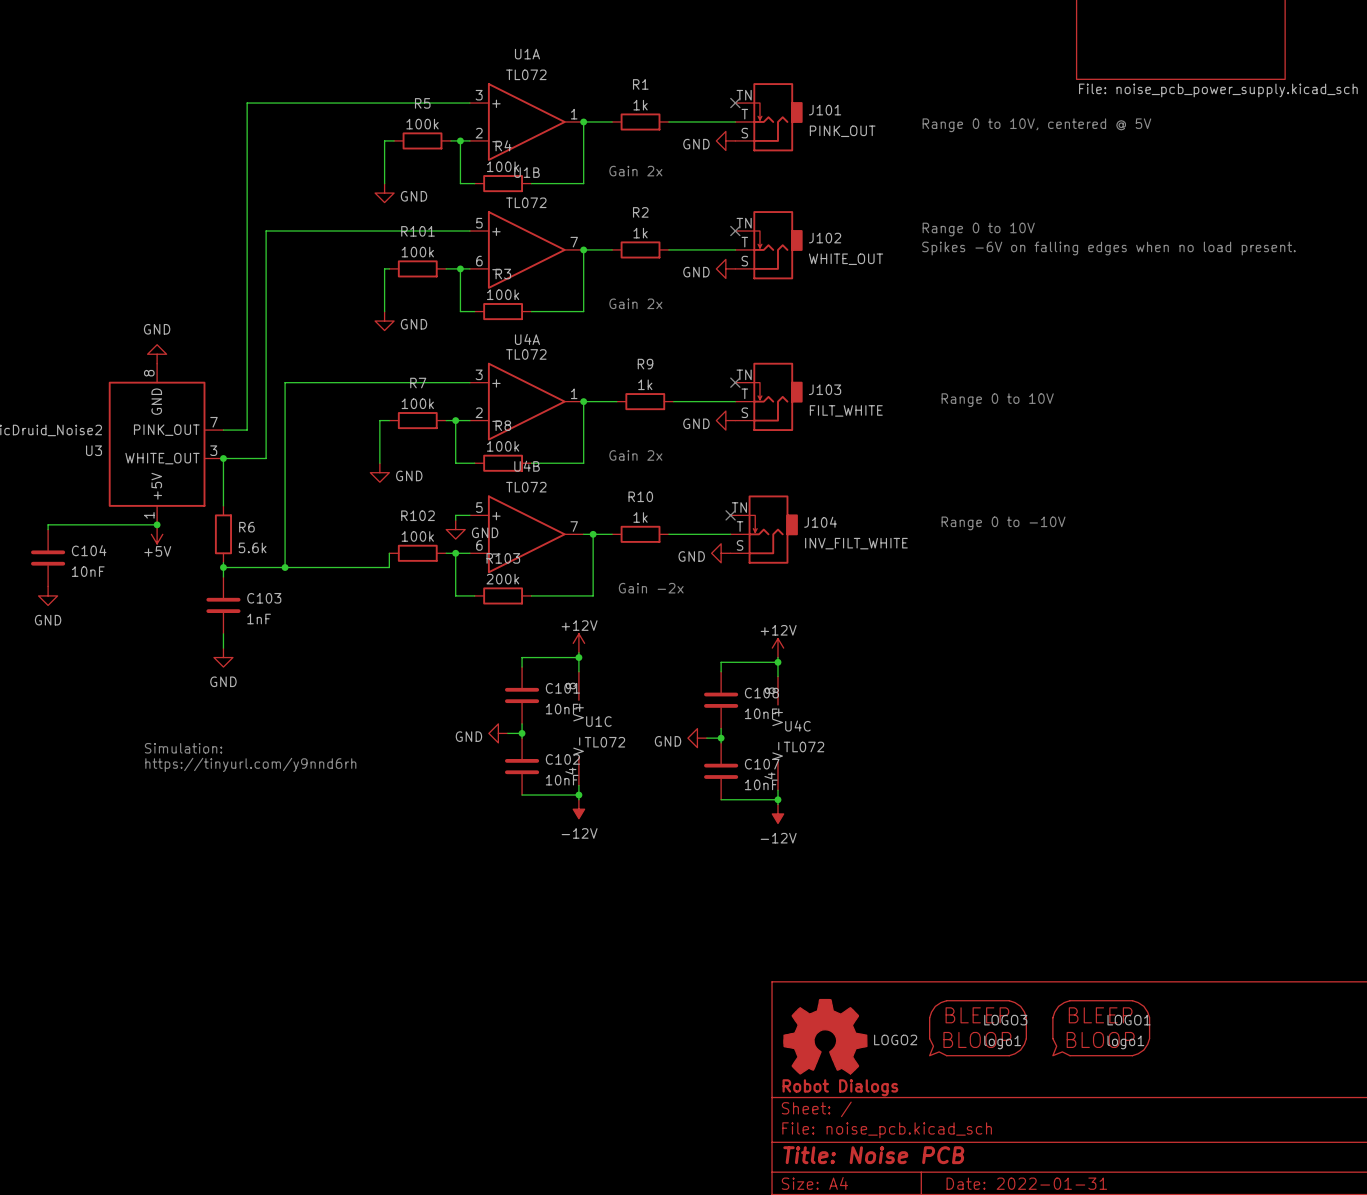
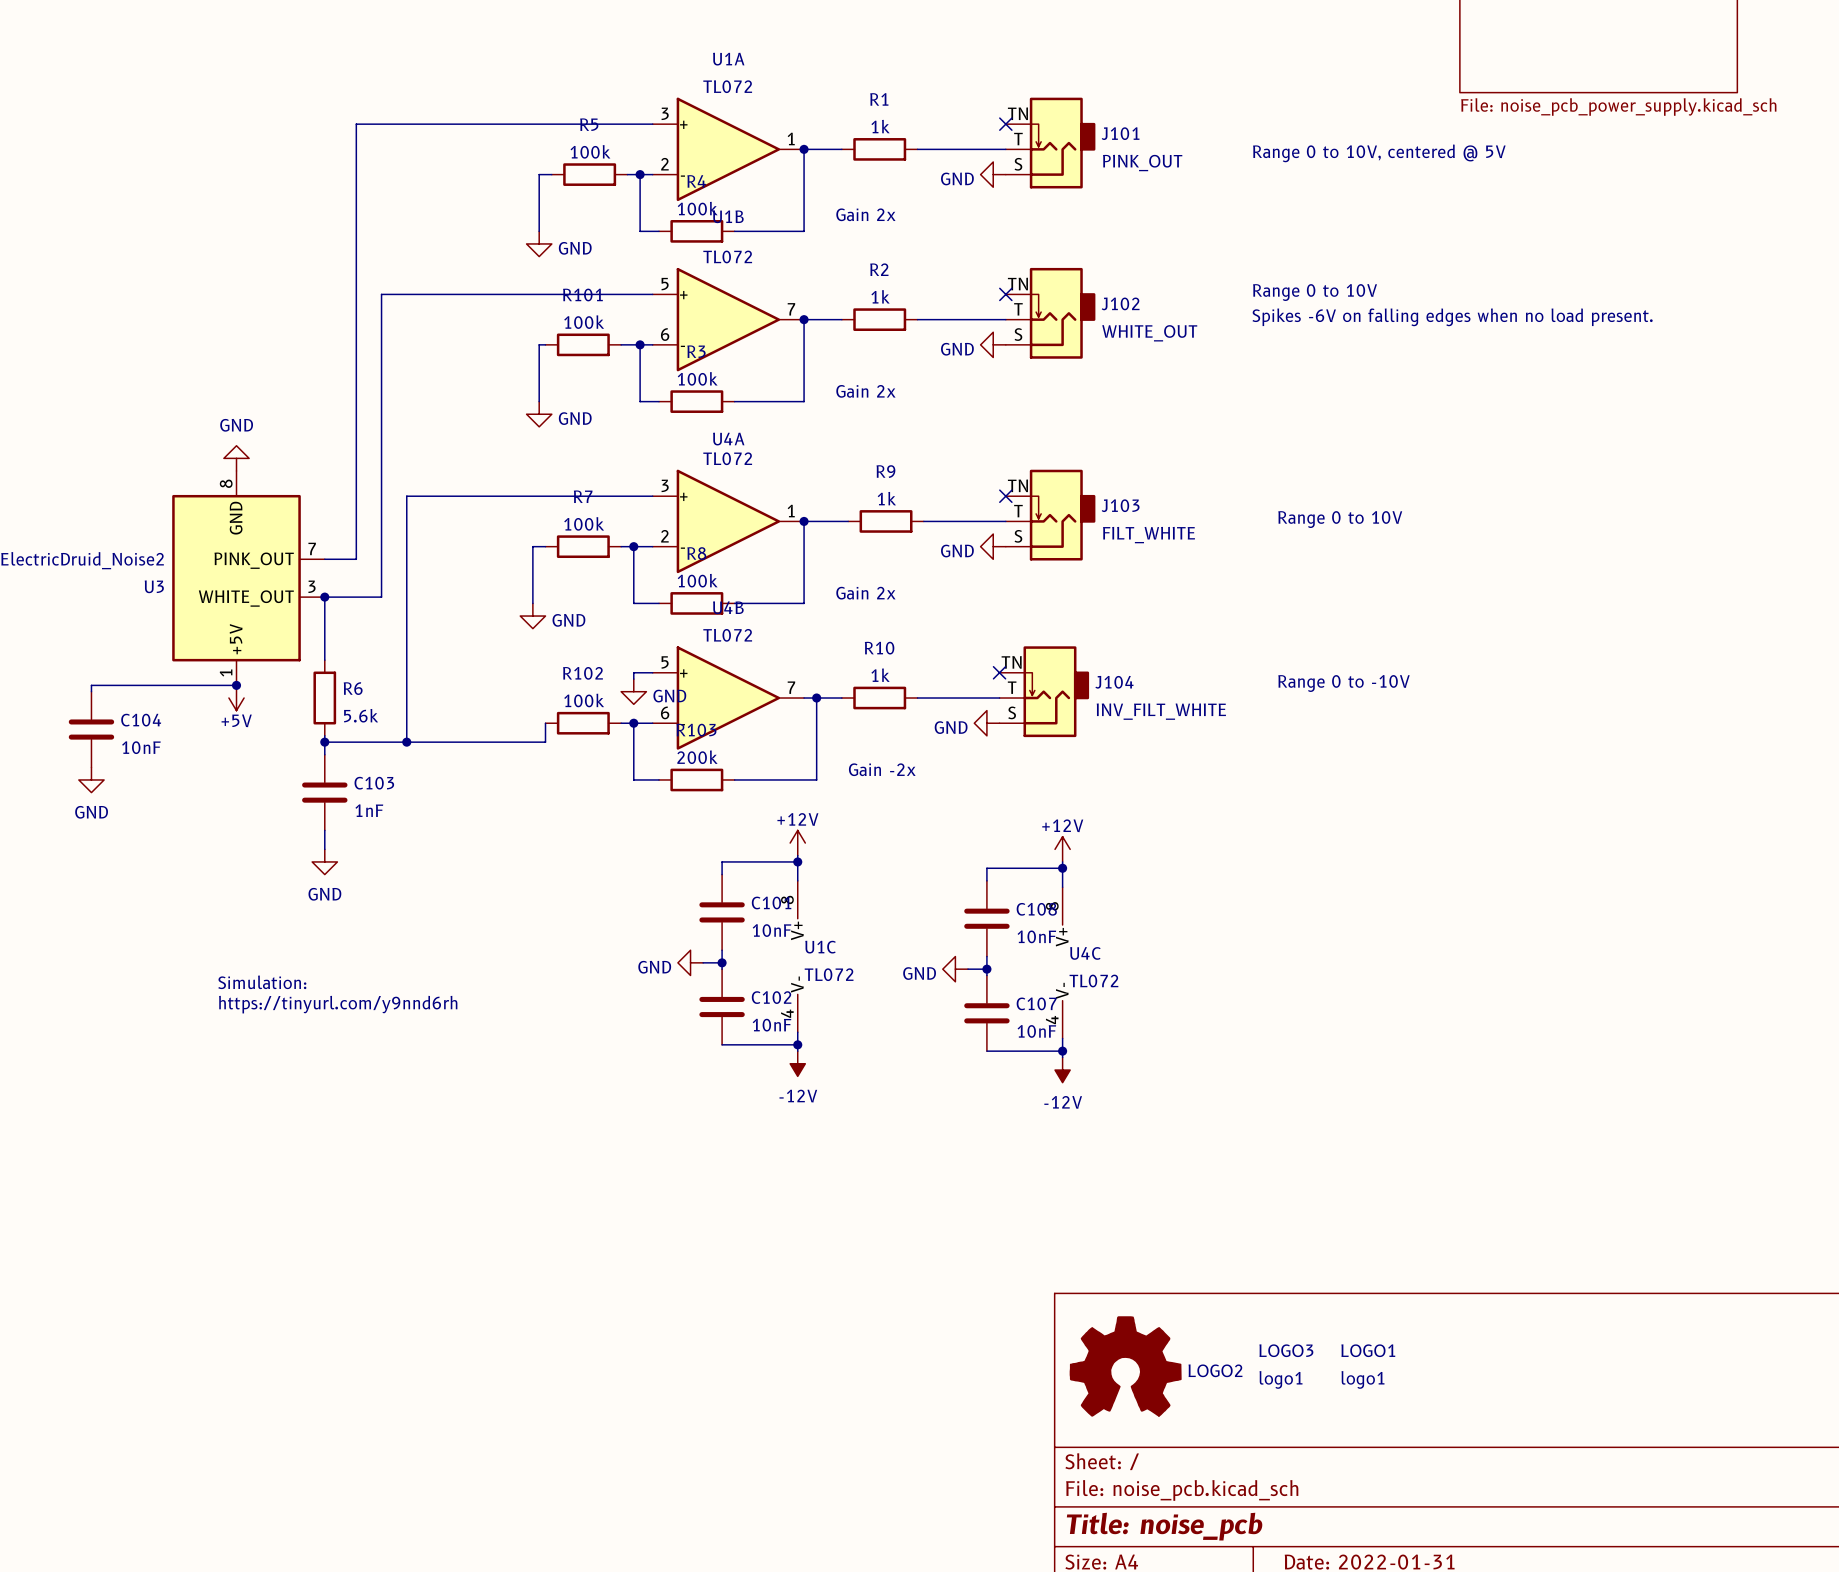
LOGO3 symbol: [929, 1000, 1027, 1061] -> [1259, 1344, 1314, 1389]
LOGO1 symbol: [1052, 1000, 1151, 1061] -> [1341, 1344, 1396, 1389]
LOGO3 name position: LOGO3 (1005, 1020) -> LOGO3 (1286, 1350)
LOGO1 name position: LOGO1 (1129, 1020) -> LOGO1 (1368, 1350)
LOGO3 value position: logo1 (1002, 1042) -> logo1 (1281, 1379)
LOGO1 value position: logo1 (1125, 1042) -> logo1 (1363, 1379)
title block: Robot Dialogs (840, 1087) -> none
title block: Title: Noise PCB (873, 1155) -> Title: noise_pcb (1164, 1526)

